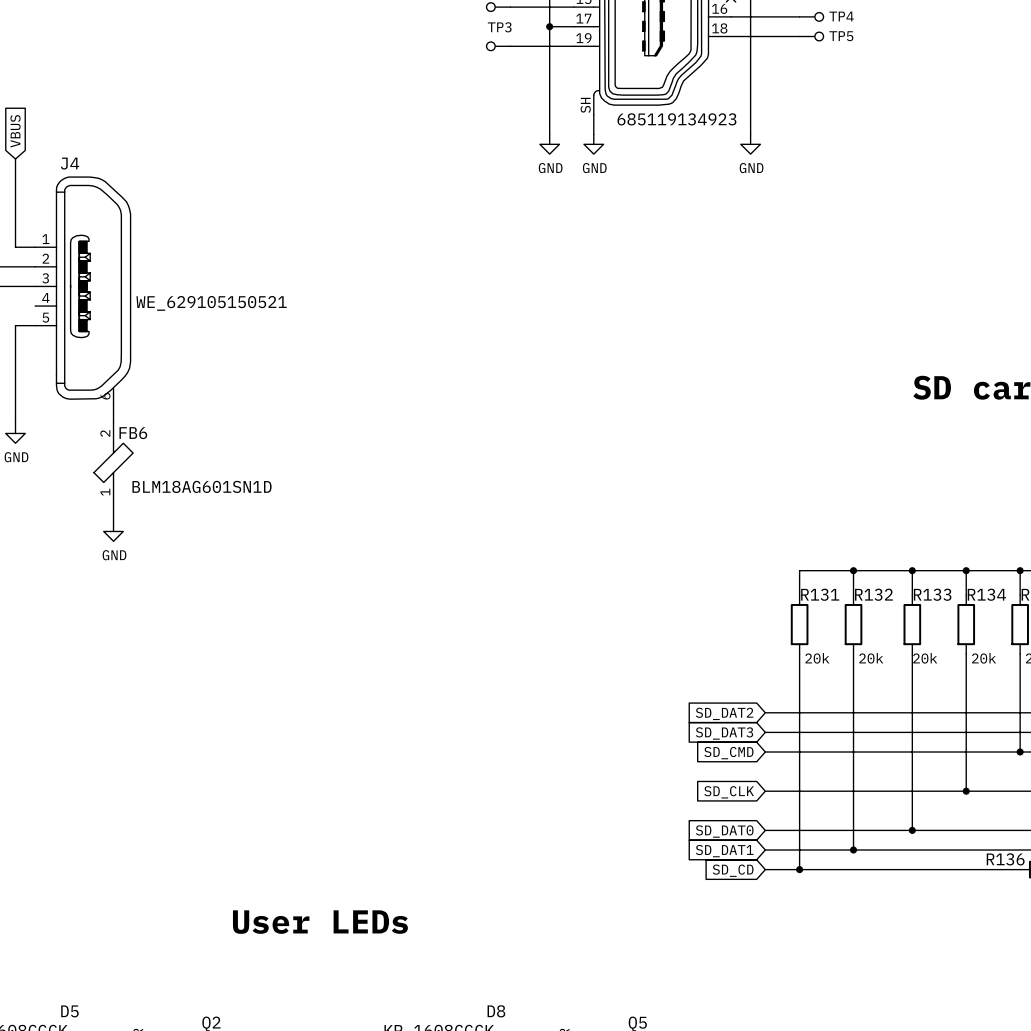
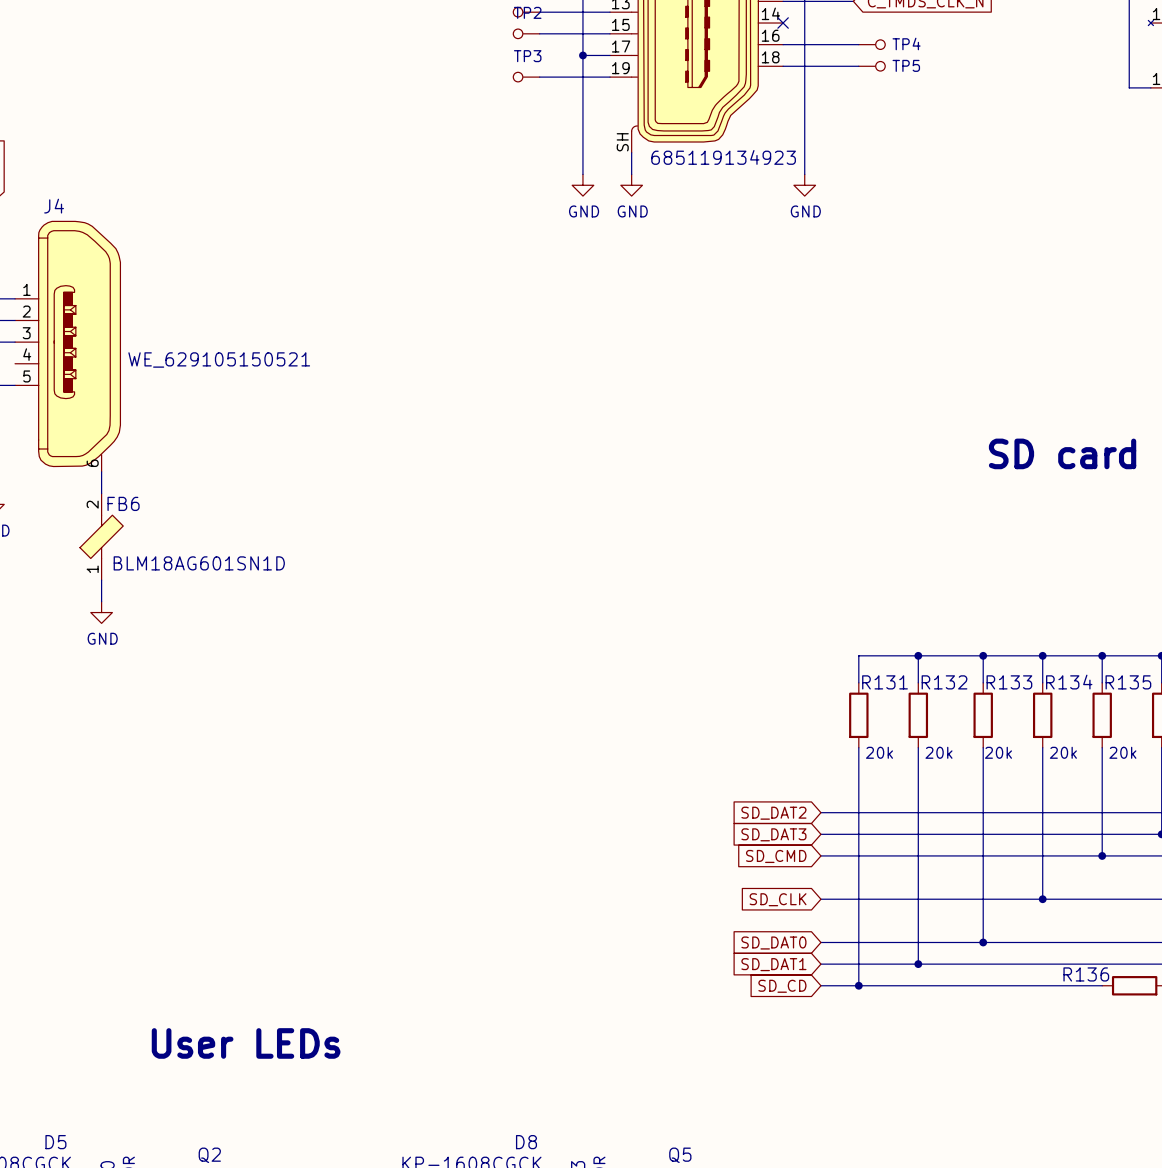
text position: User LEDs (320, 922) -> User LEDs (246, 1043)

